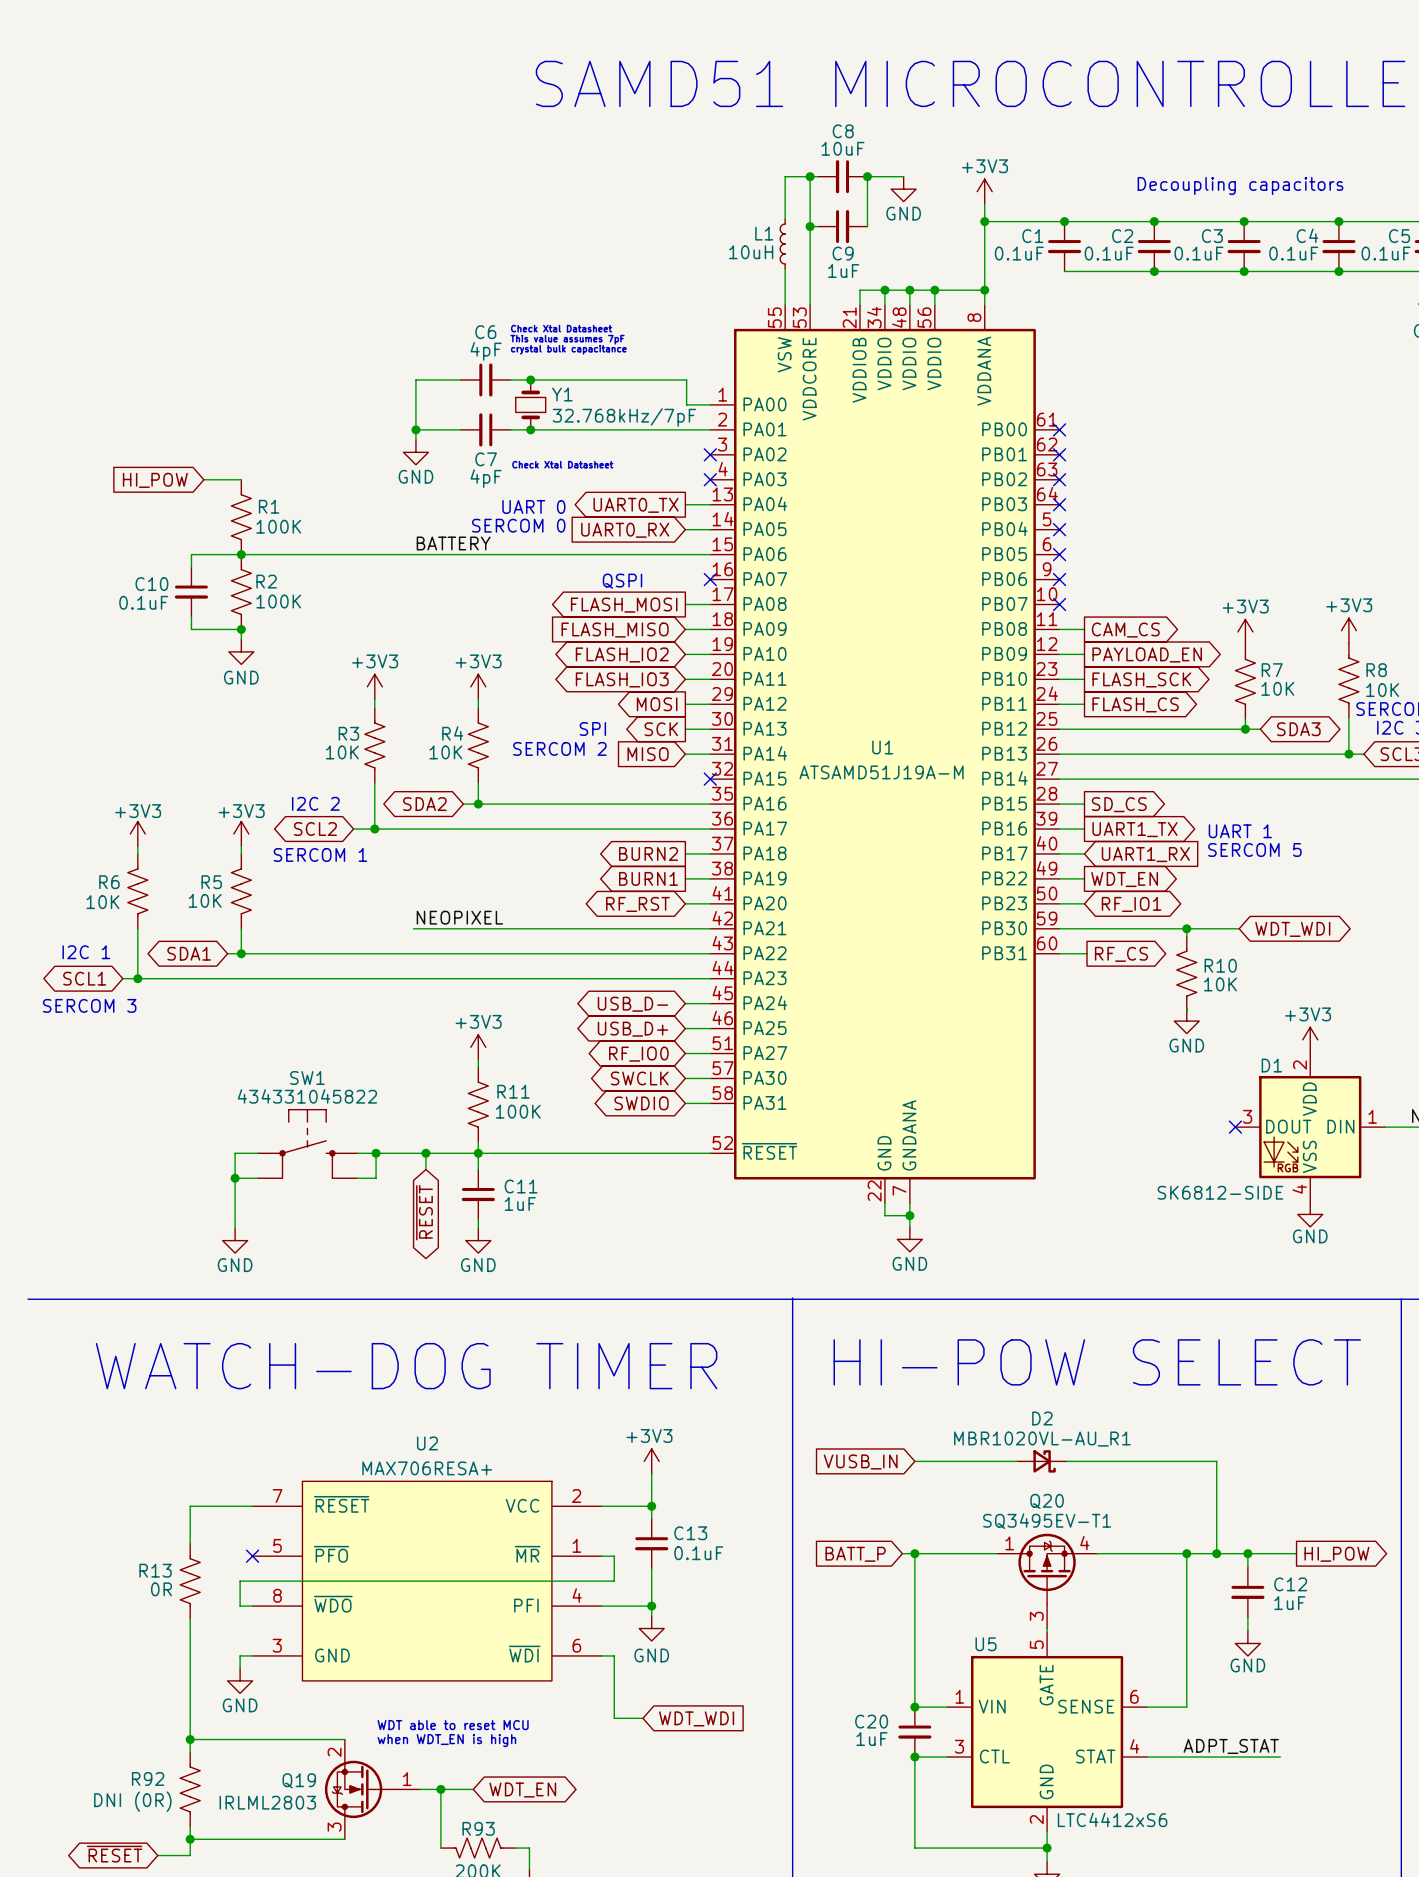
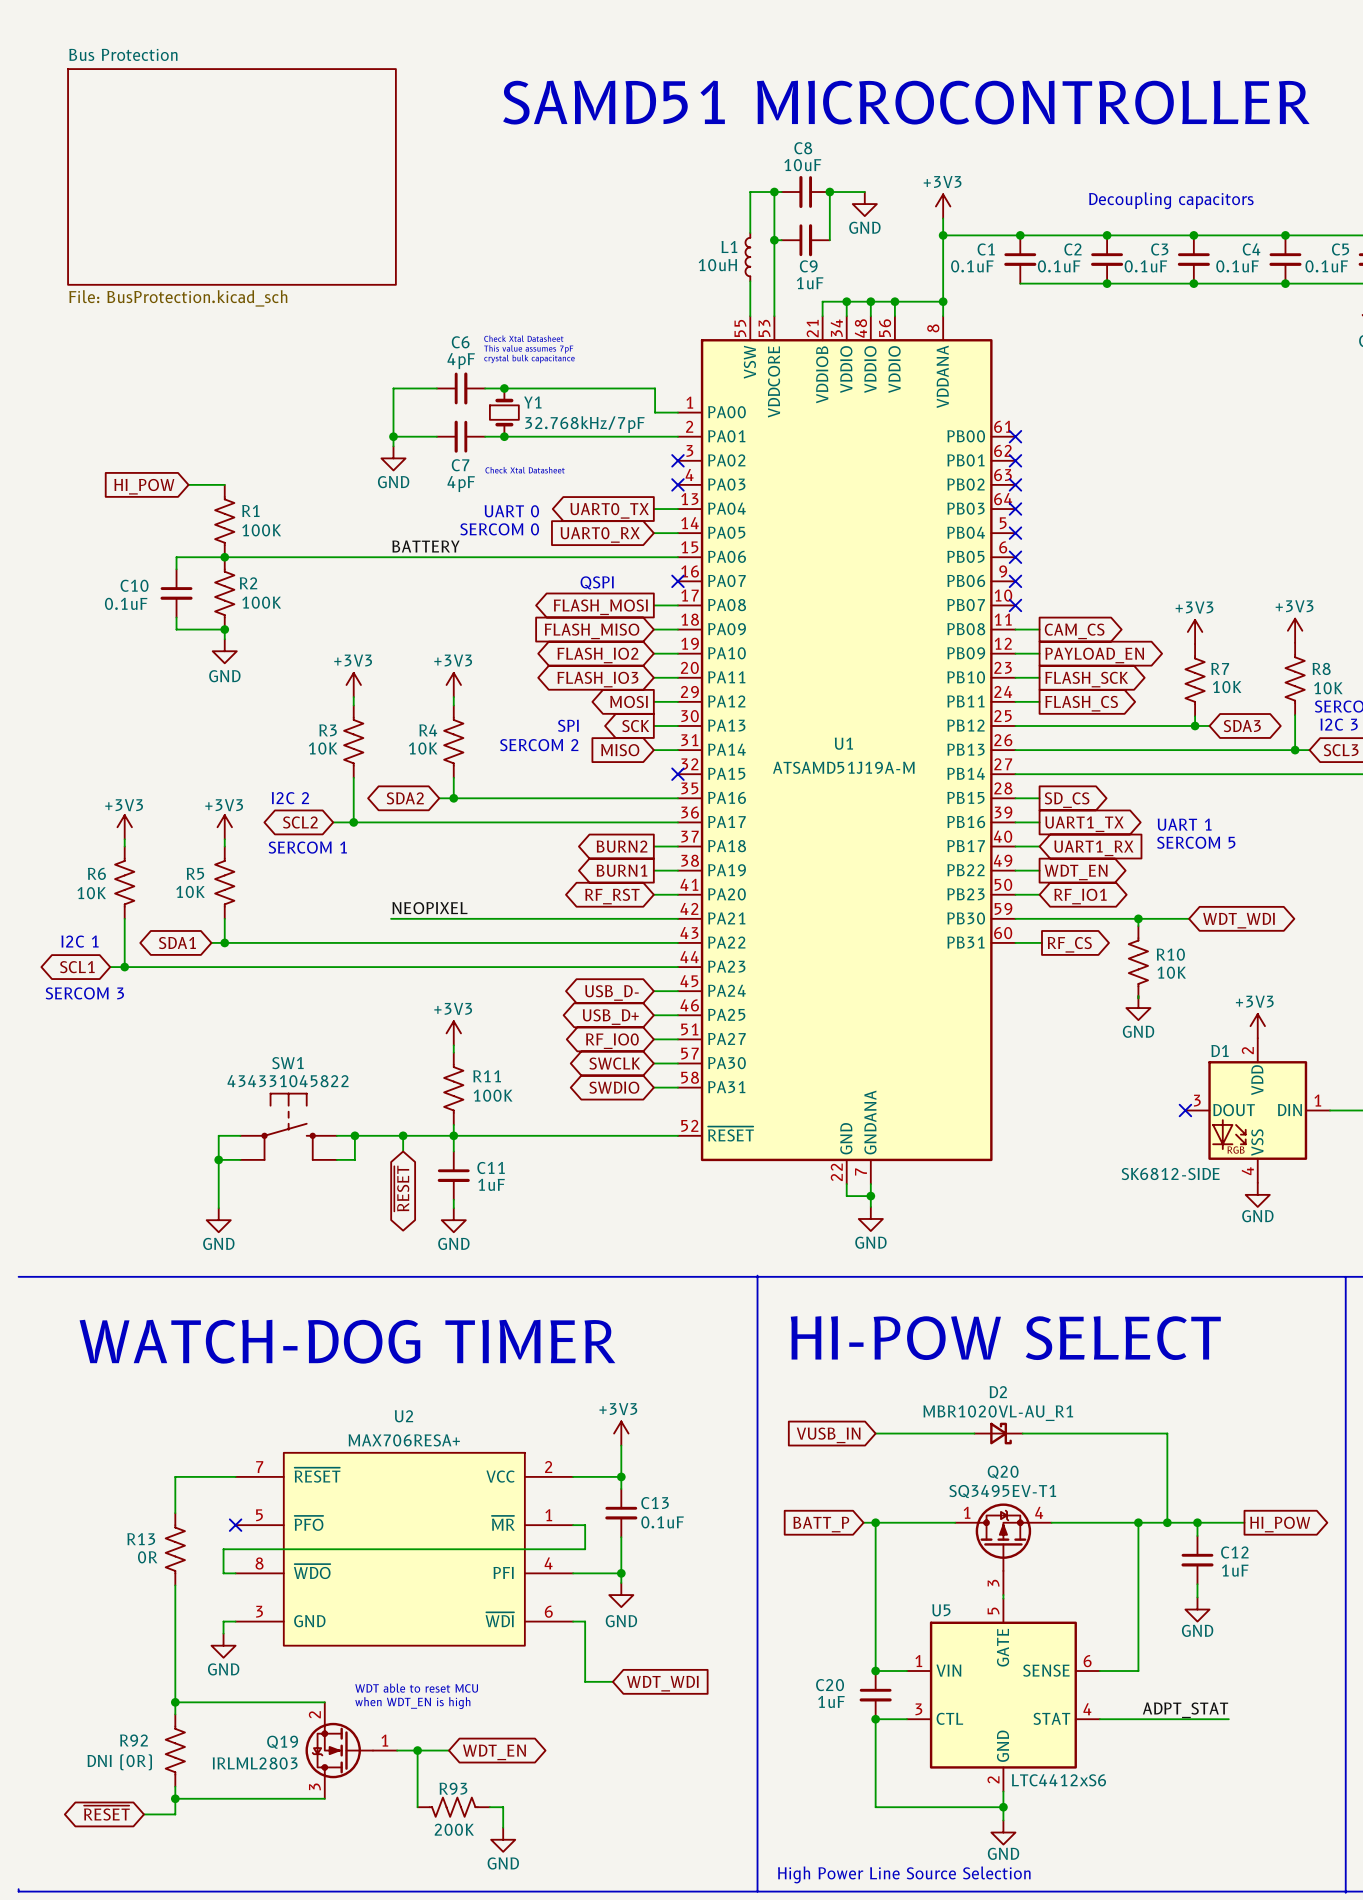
sheet Bus Protection: none -> File: BusProtection.kicad_sch (231, 176)

